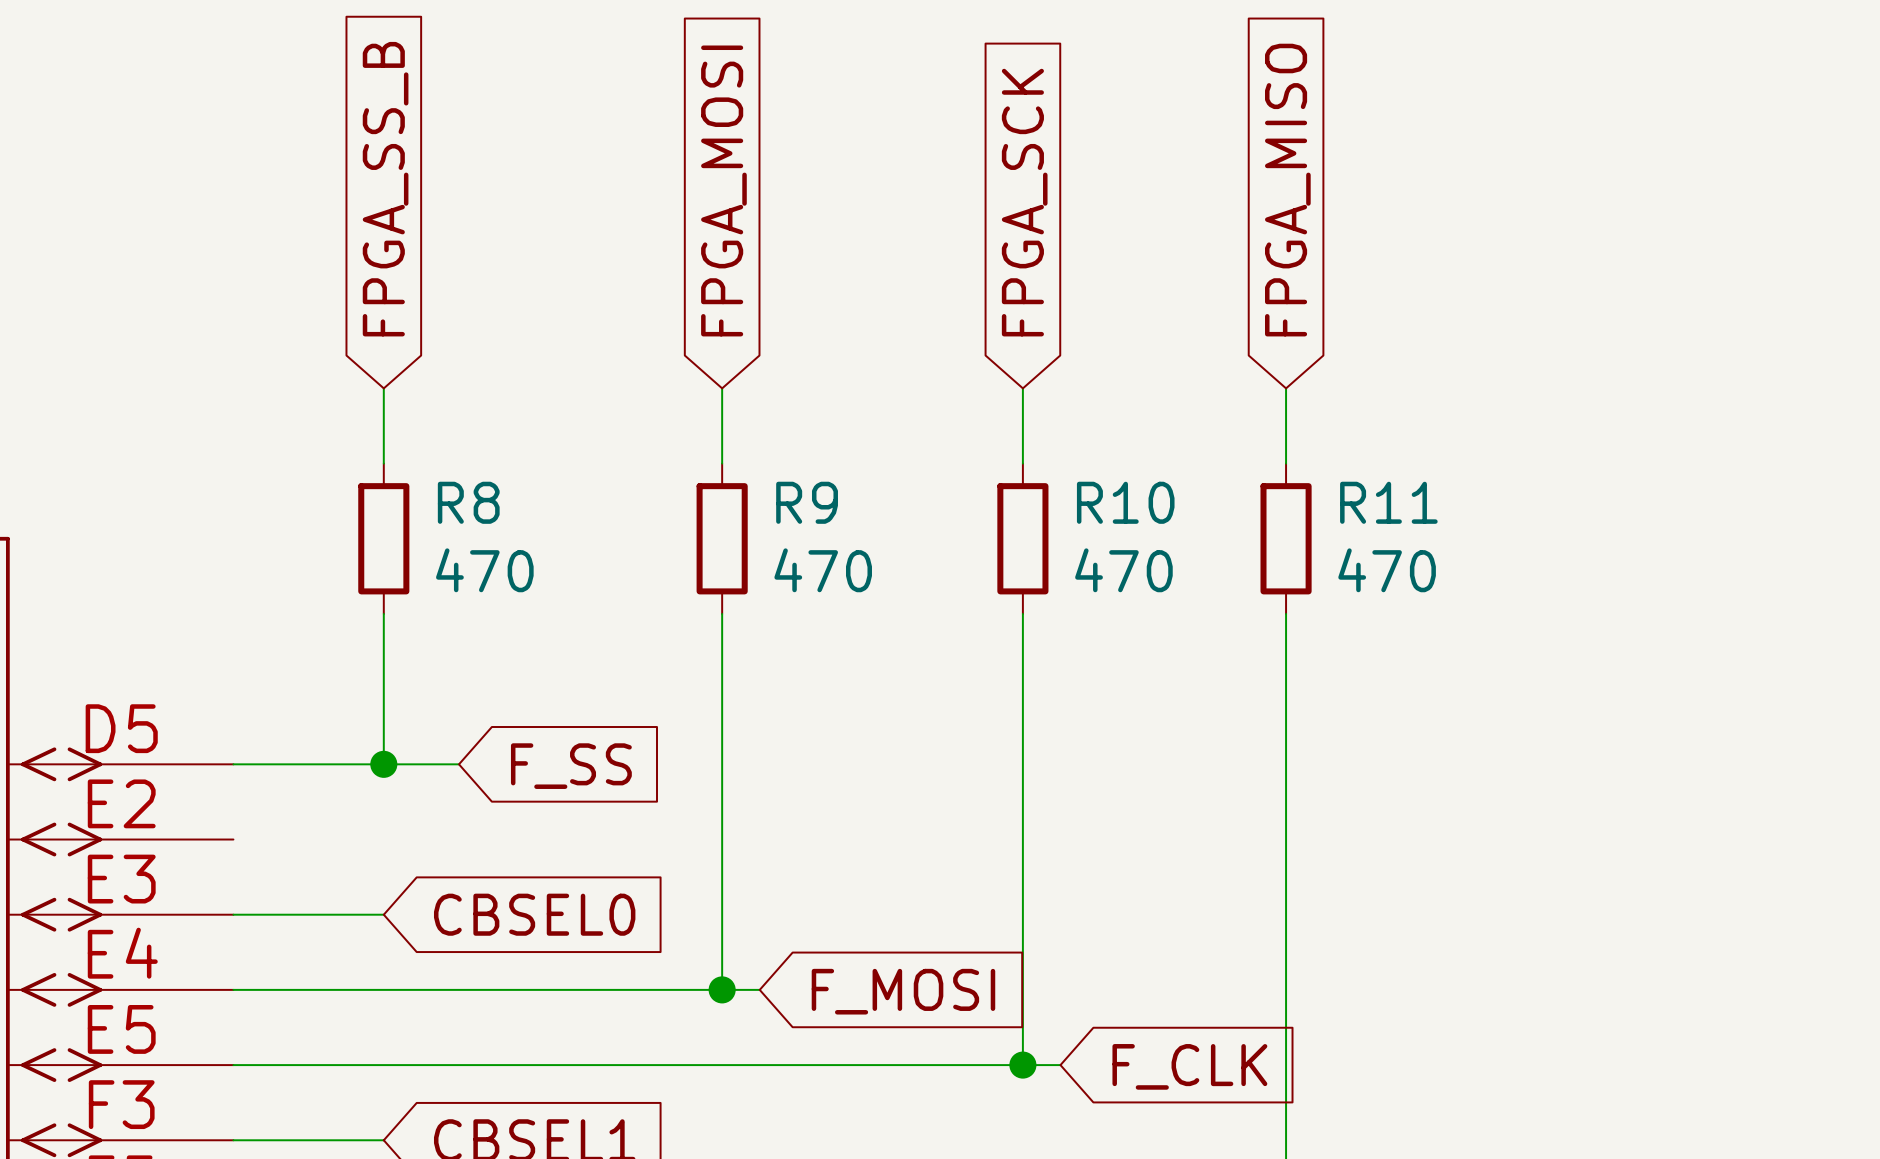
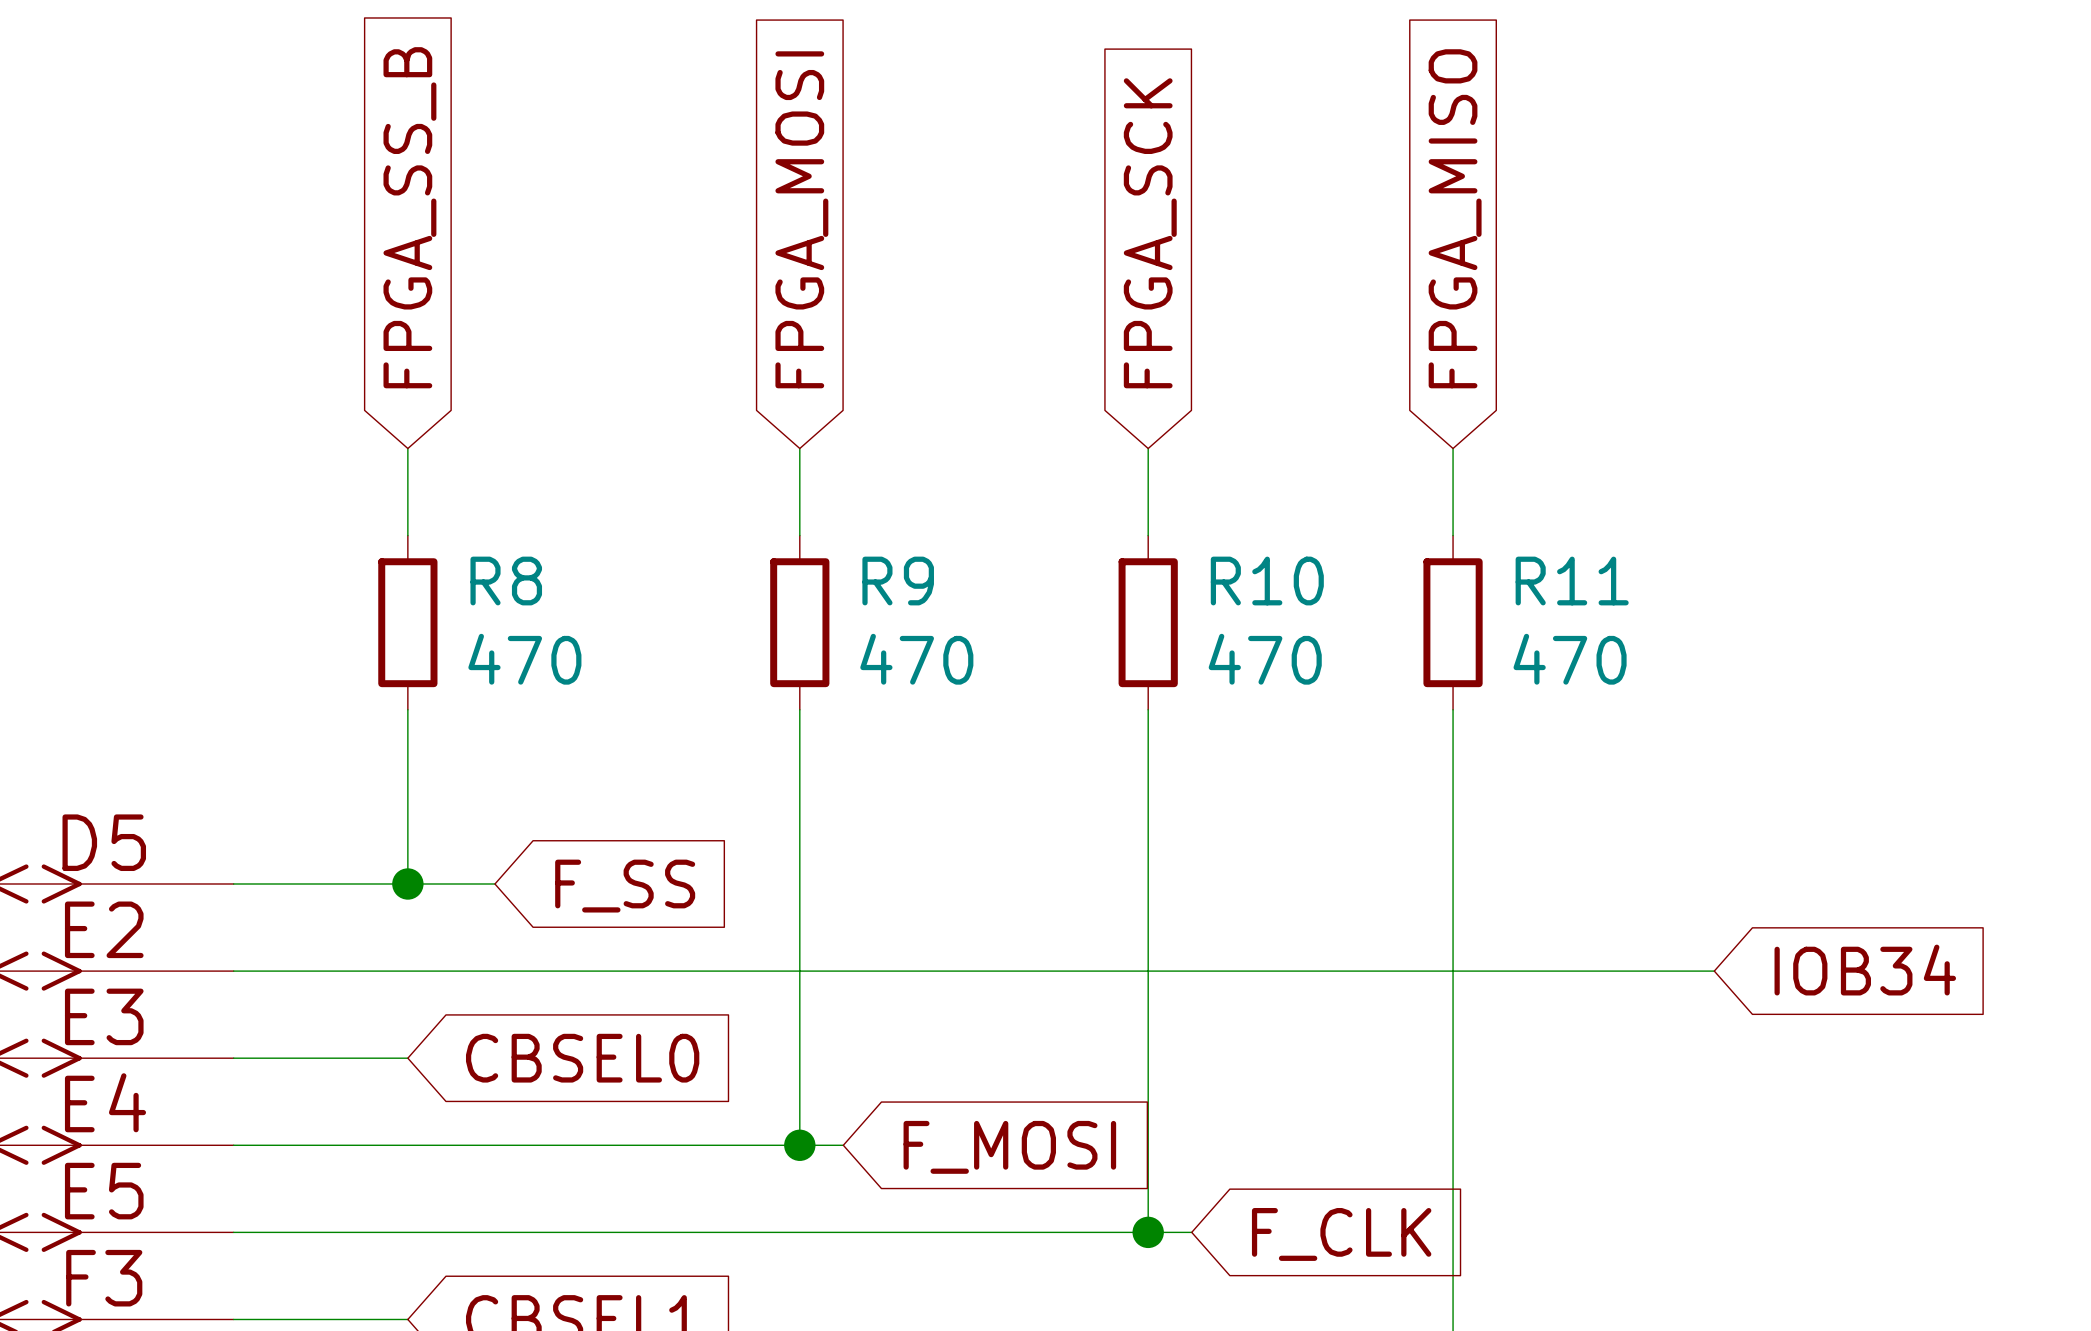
global label: none -> IOB34 (1865, 970)
wire: none -> (233, 971) (1714, 971)

